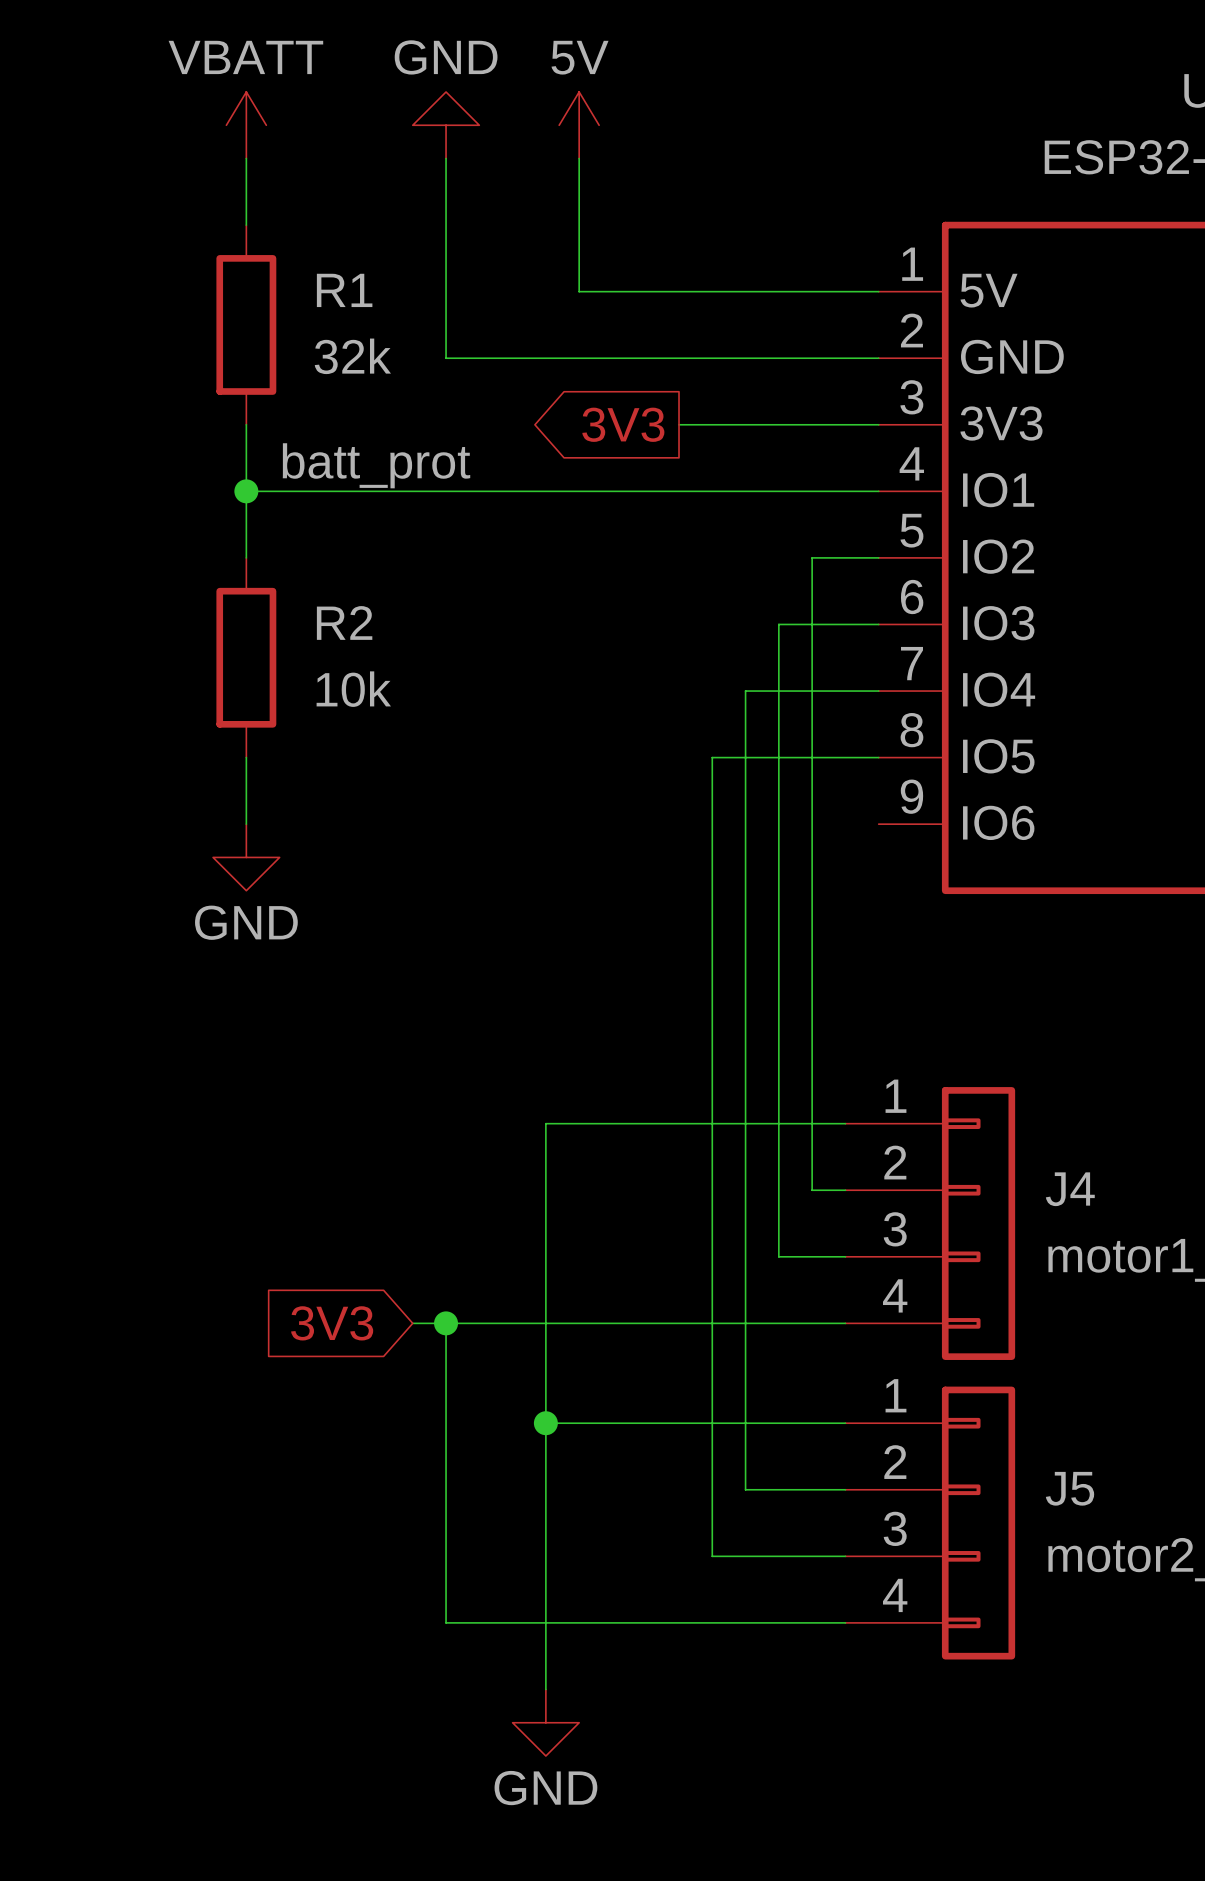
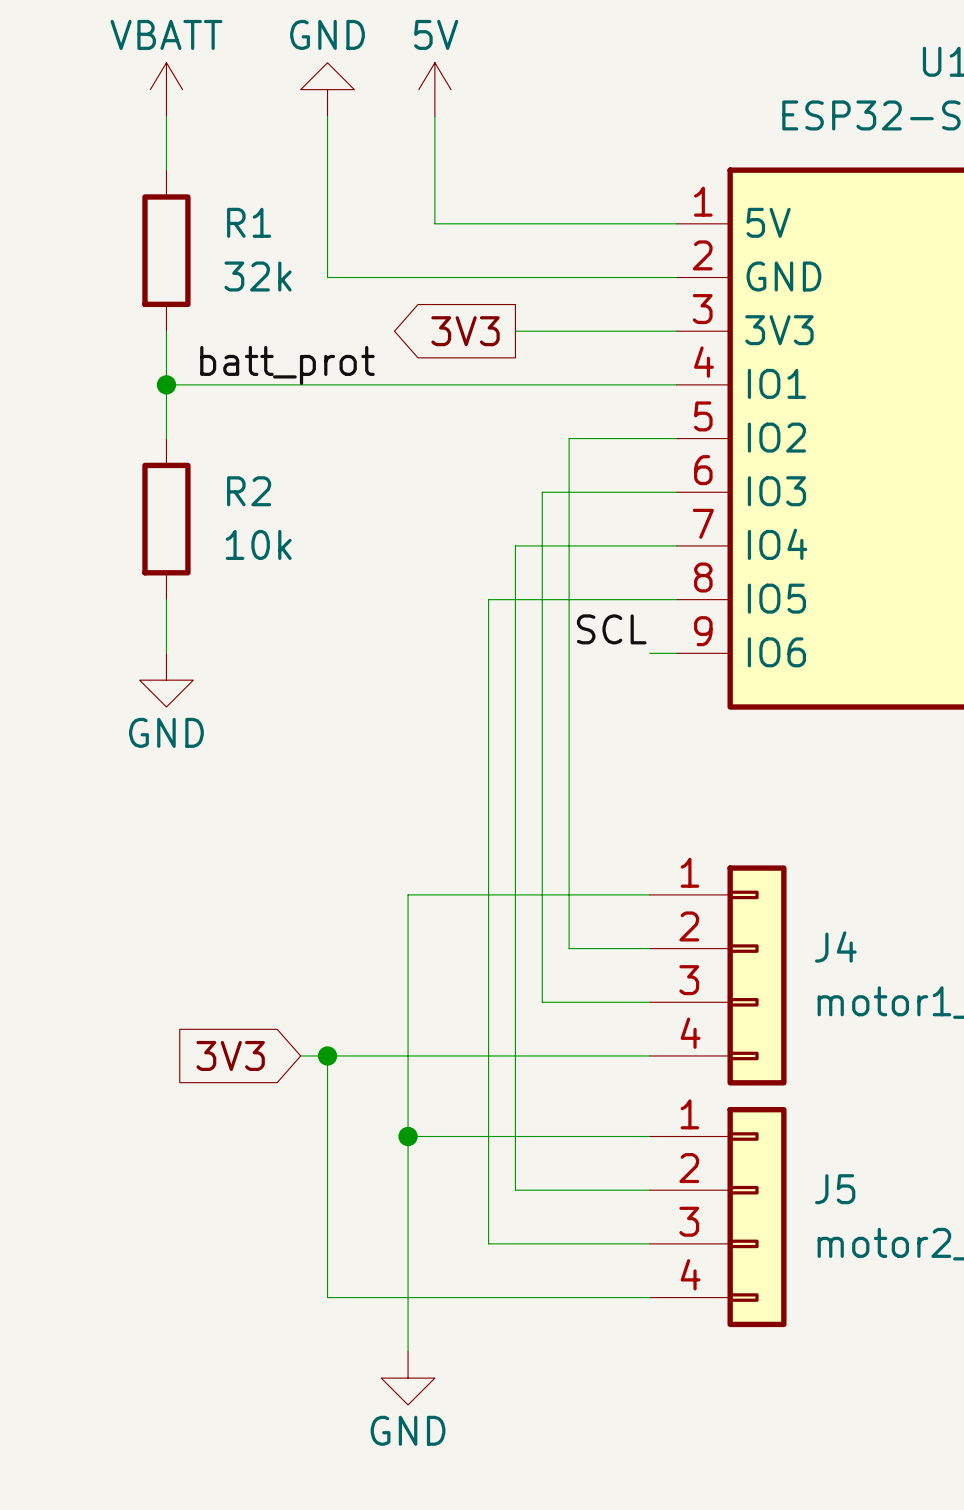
wire: (812, 557) (812, 1190) -> (622, 438) (569, 438) (569, 545) (515, 545) (515, 1190) (569, 1190)
wire: (778, 624) (778, 1256) -> (595, 492) (542, 492) (542, 599) (488, 599) (488, 1243) (542, 1243)
label: none -> SCL (611, 629)
wire: none -> (649, 653) (676, 653)
wire: (745, 1190) (745, 1489) -> (569, 948) (622, 948)
wire: (712, 1256) (712, 1556) -> (542, 1002) (595, 1002)

